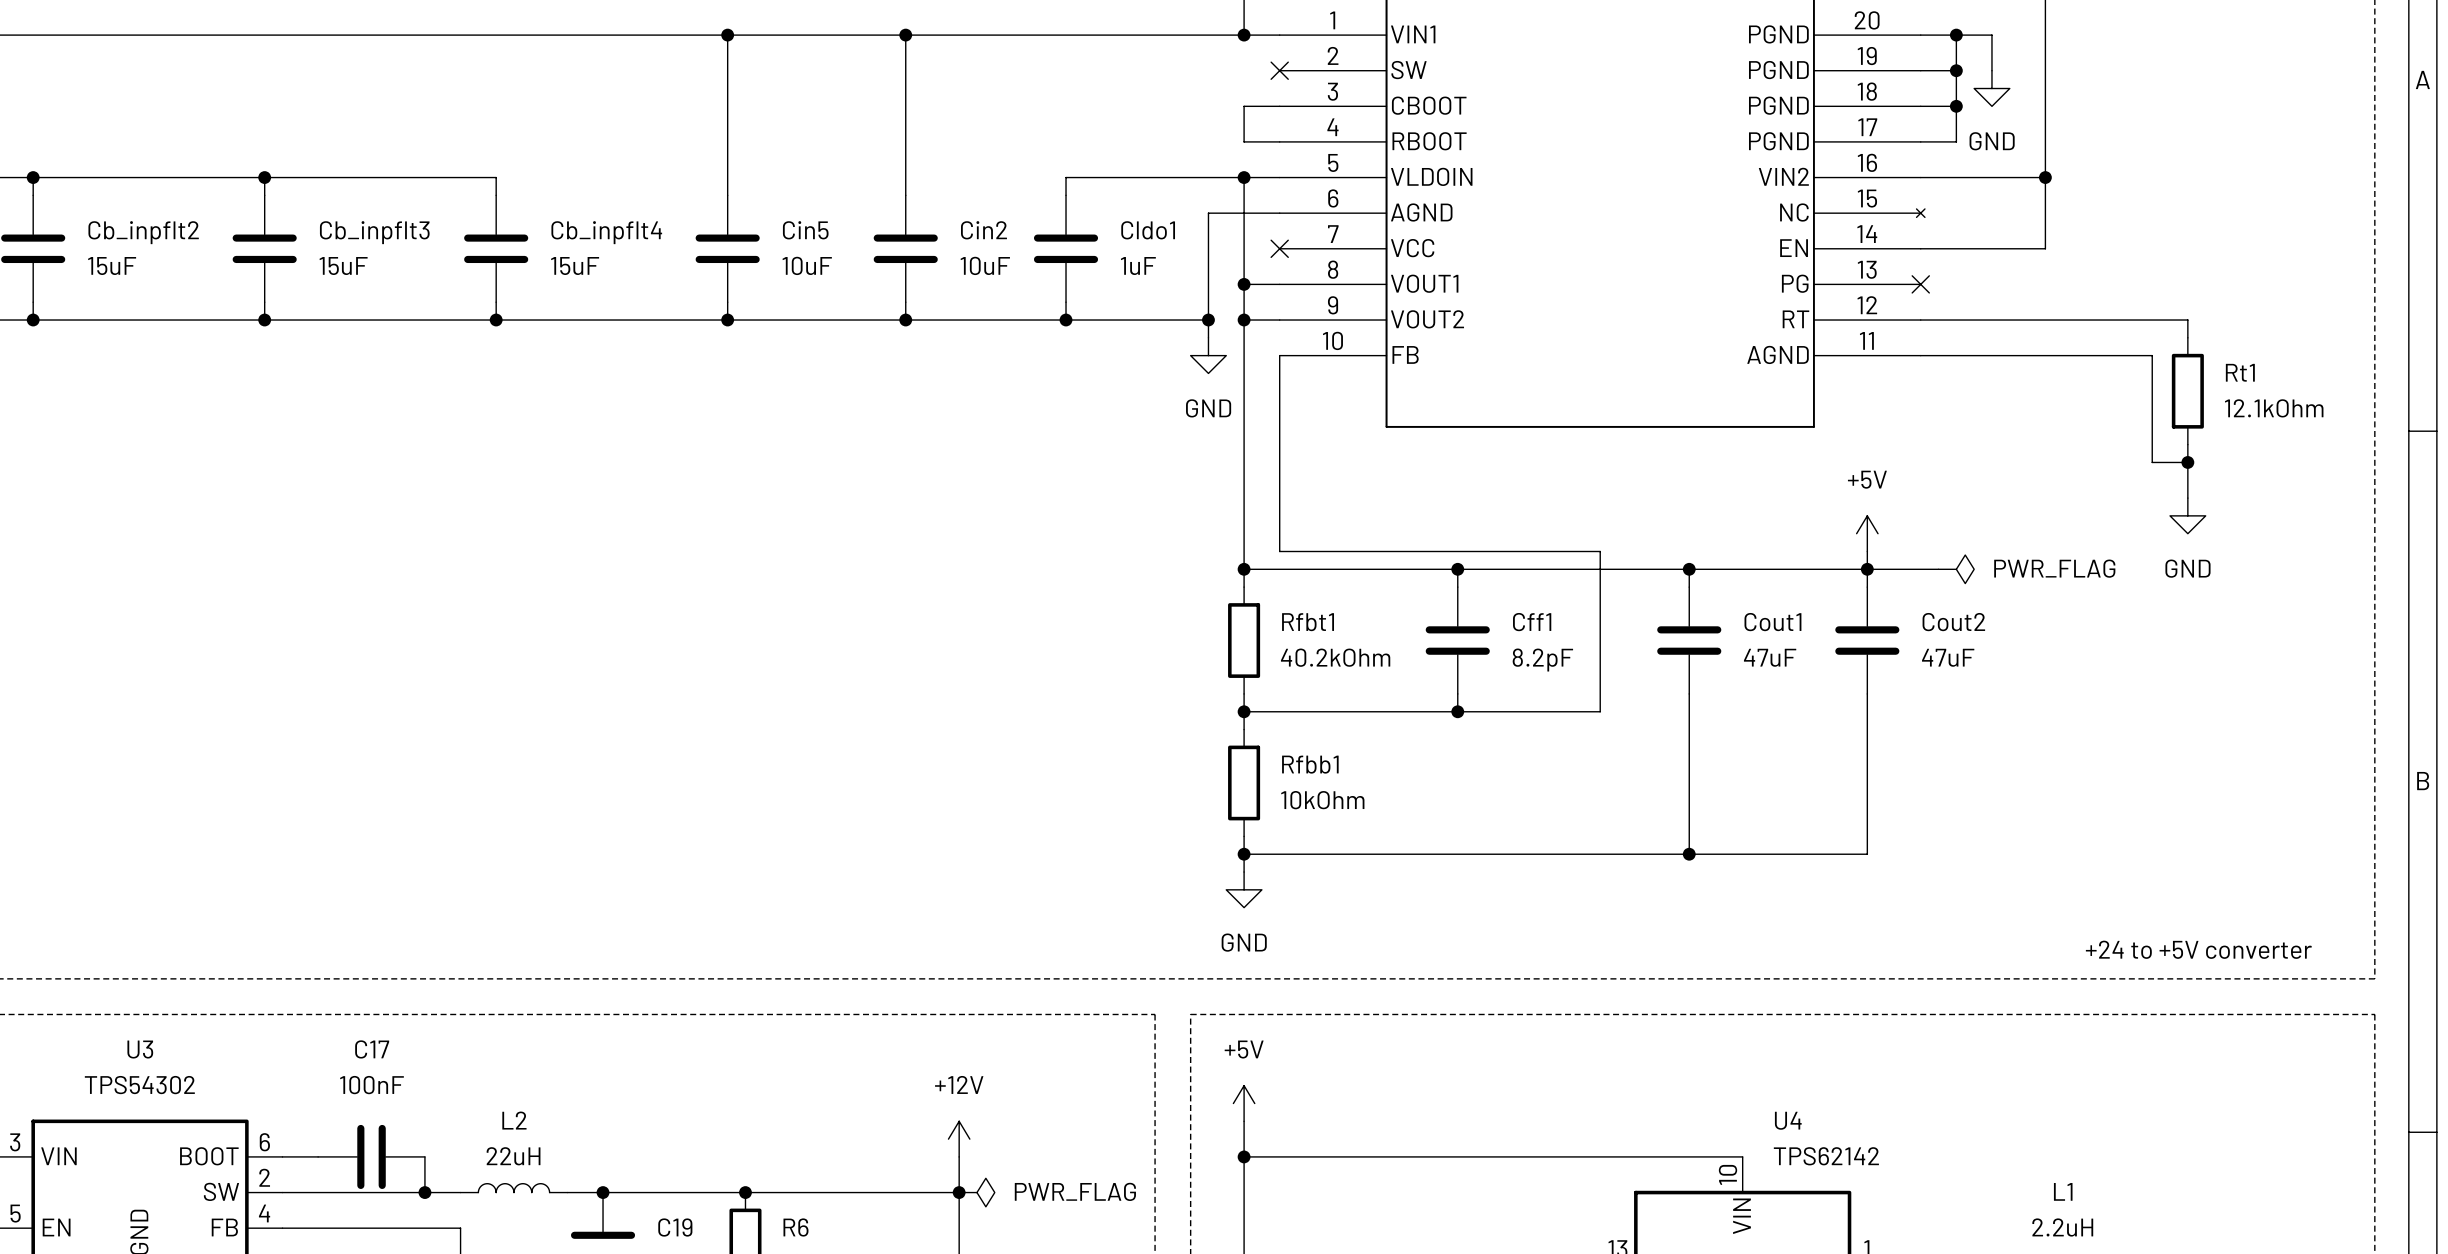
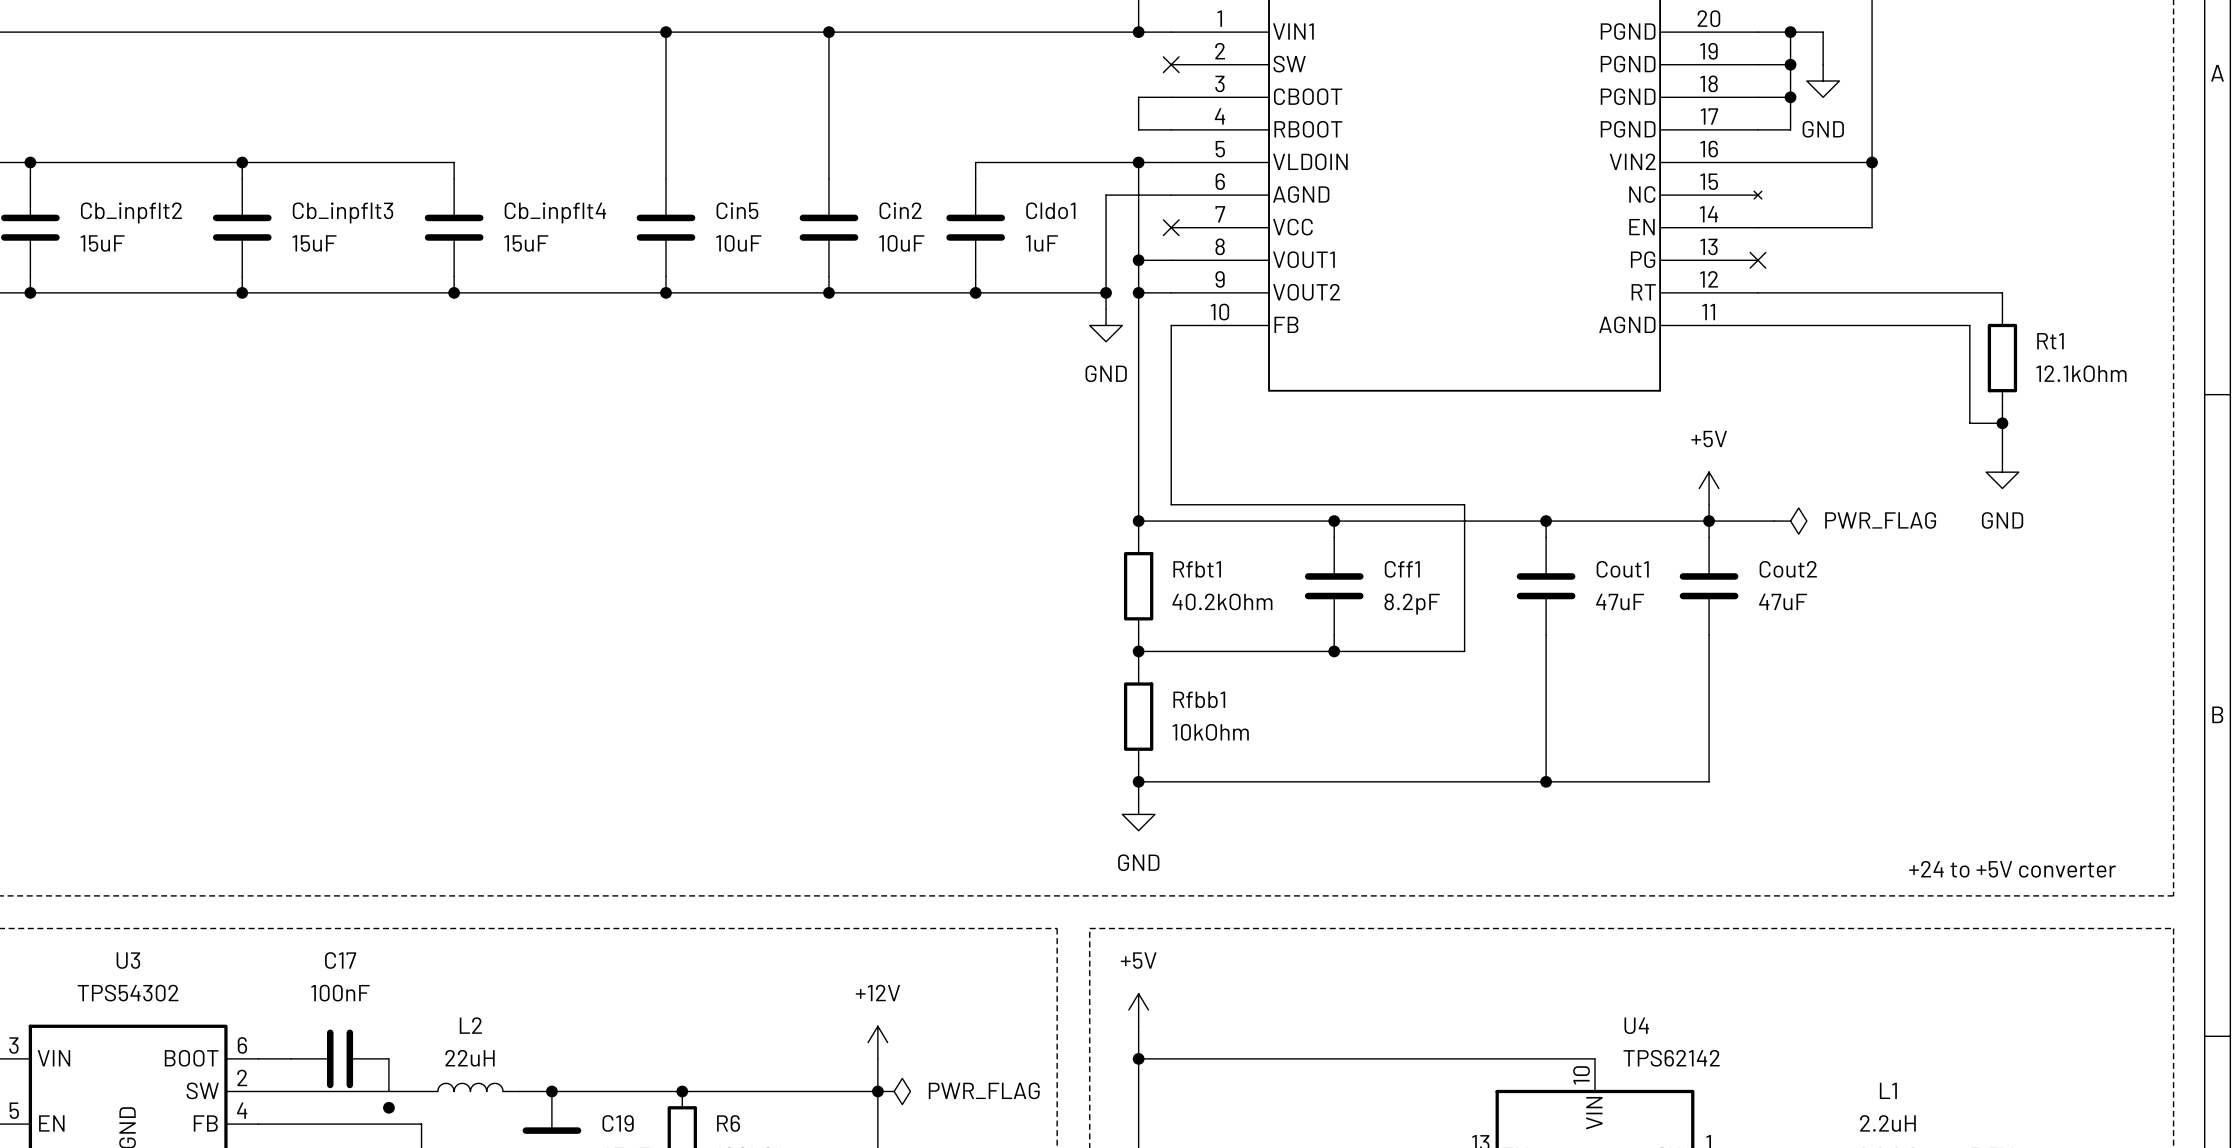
junction position: (424, 1192) -> (388, 1107)

